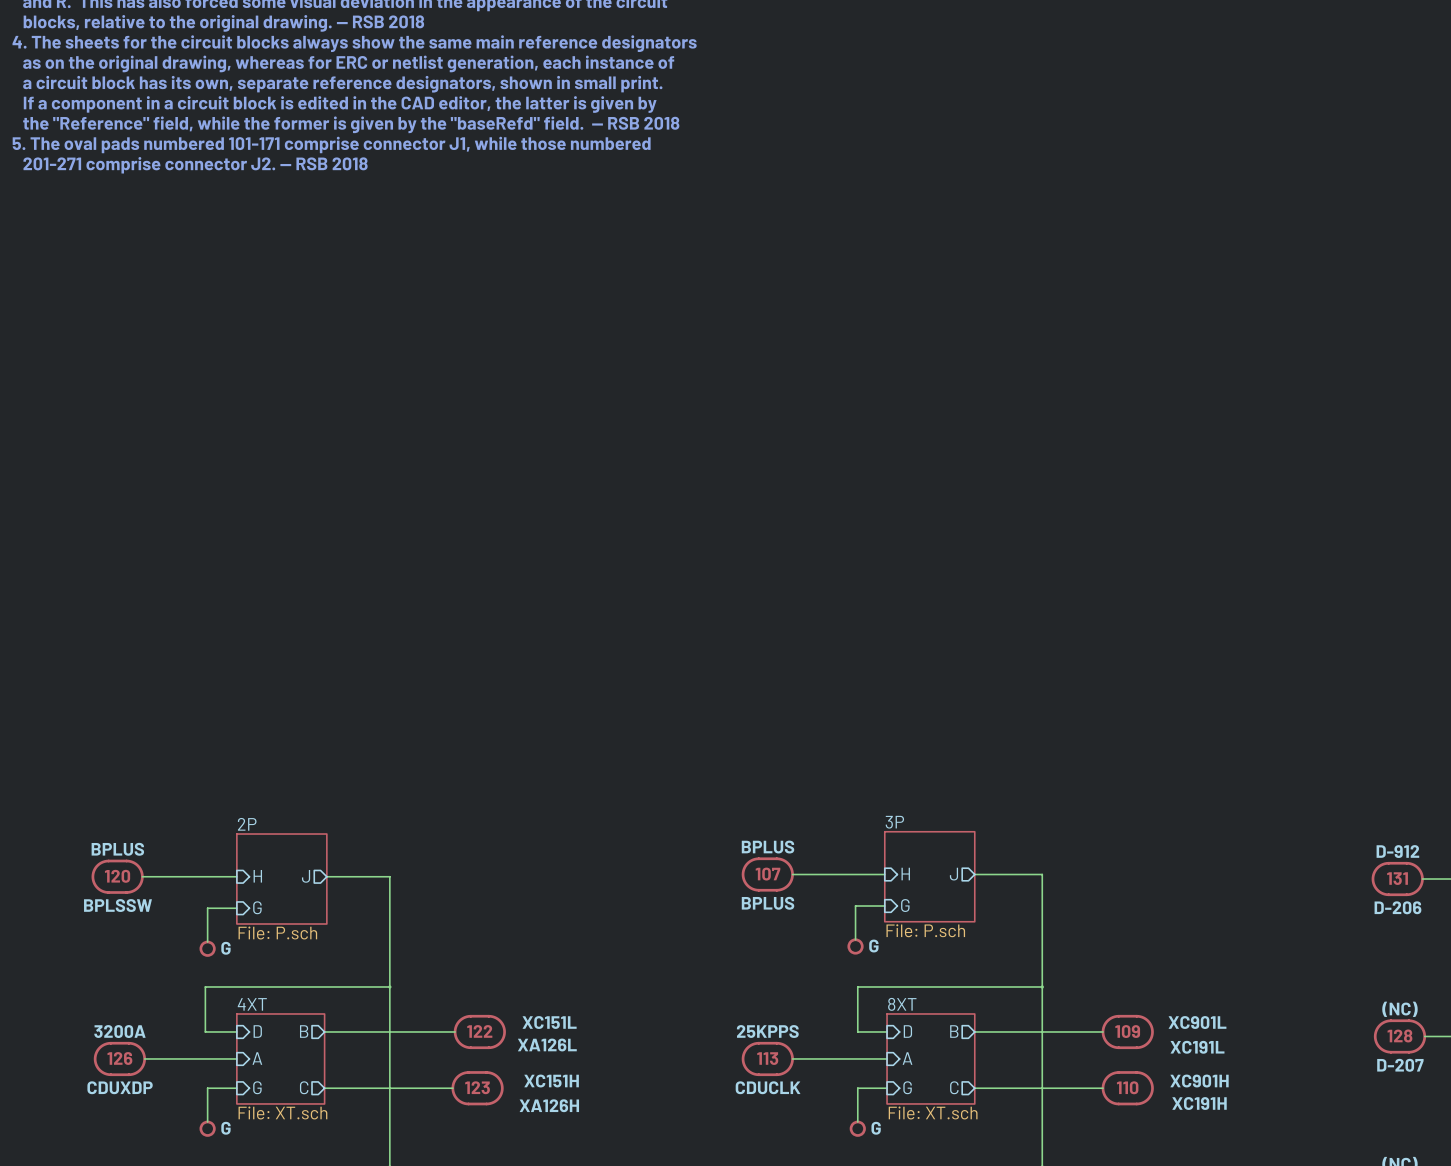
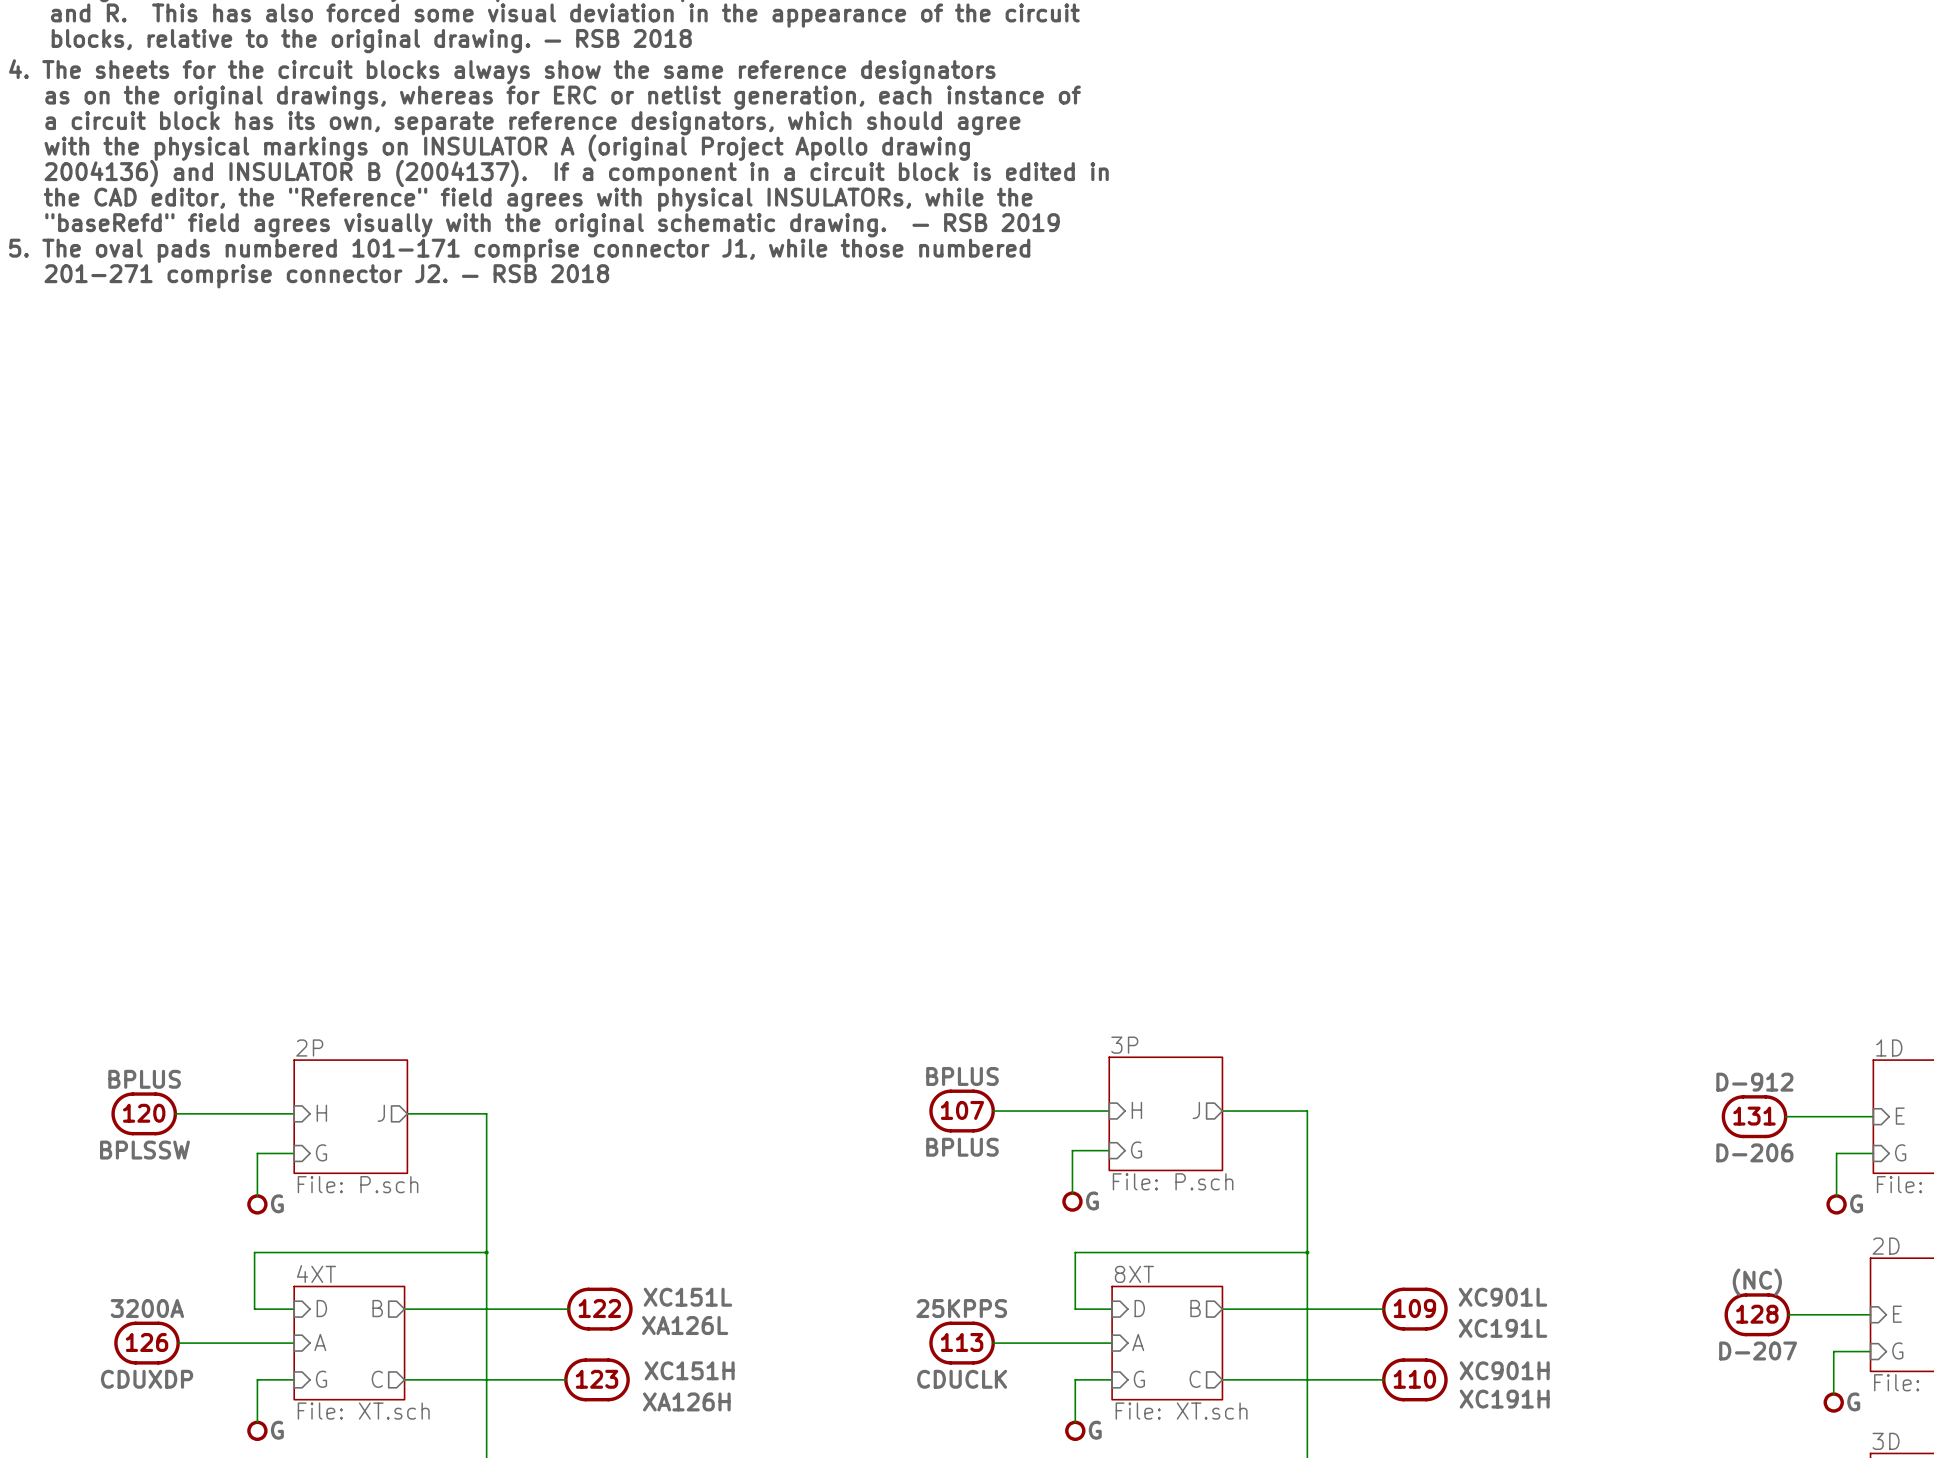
text: 4. The sheets for the circuit blocks always show the same main reference designators (354, 43) -> 4. The sheets for the circuit blocks always show the same reference designators (502, 71)
text: as on the original drawing, whereas for ERC or netlist generation, each instance of (348, 63) -> as on the original drawings, whereas for ERC or netlist generation, each instance of (563, 97)
text: a circuit block has its own, separate reference designators, shown in small print. (342, 84) -> a circuit block has its own, separate reference designators, which should agree (532, 123)
text: If a component in a circuit block is edited in the CAD editor, the latter is given by (340, 104) -> none
text: none -> with the physical markings on INSULATOR A (original Project Apollo drawing (507, 147)
text: the "Reference" field, while the former is given by the "baseRefd" field. — RSB 2018 (351, 124) -> none
text: none -> 2004136) and INSULATOR B (2004137). If a component in a circuit block is edited in (576, 173)
text position: 5. The oval pads numbered 101-171 comprise connector J1, while those numbered (331, 144) -> 5. The oval pads numbered 101-171 comprise connector J1, while those numbered (519, 250)
text: none -> the CAD editor, the "Reference" field agrees with physical INSULATORs, while the (538, 199)
text position: 201-271 comprise connector J2. — RSB 2018 (195, 165) -> 201-271 comprise connector J2. — RSB 2018 (326, 276)
text: none -> "baseRefd" field agrees visually with the original schematic drawing. — RSB 2019 (552, 225)

